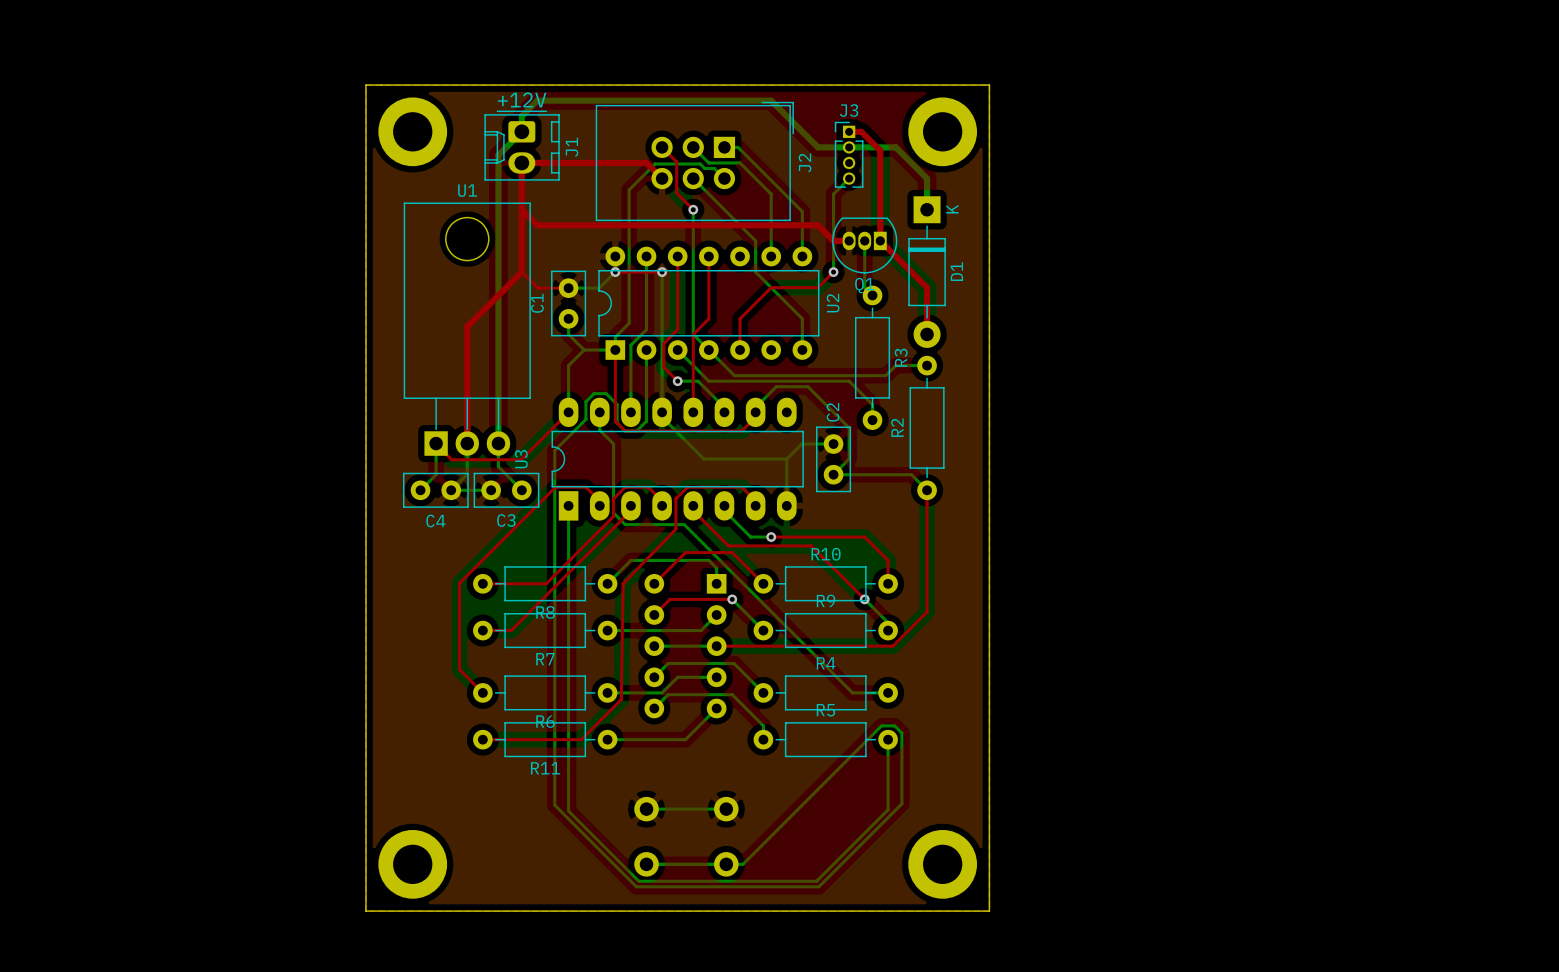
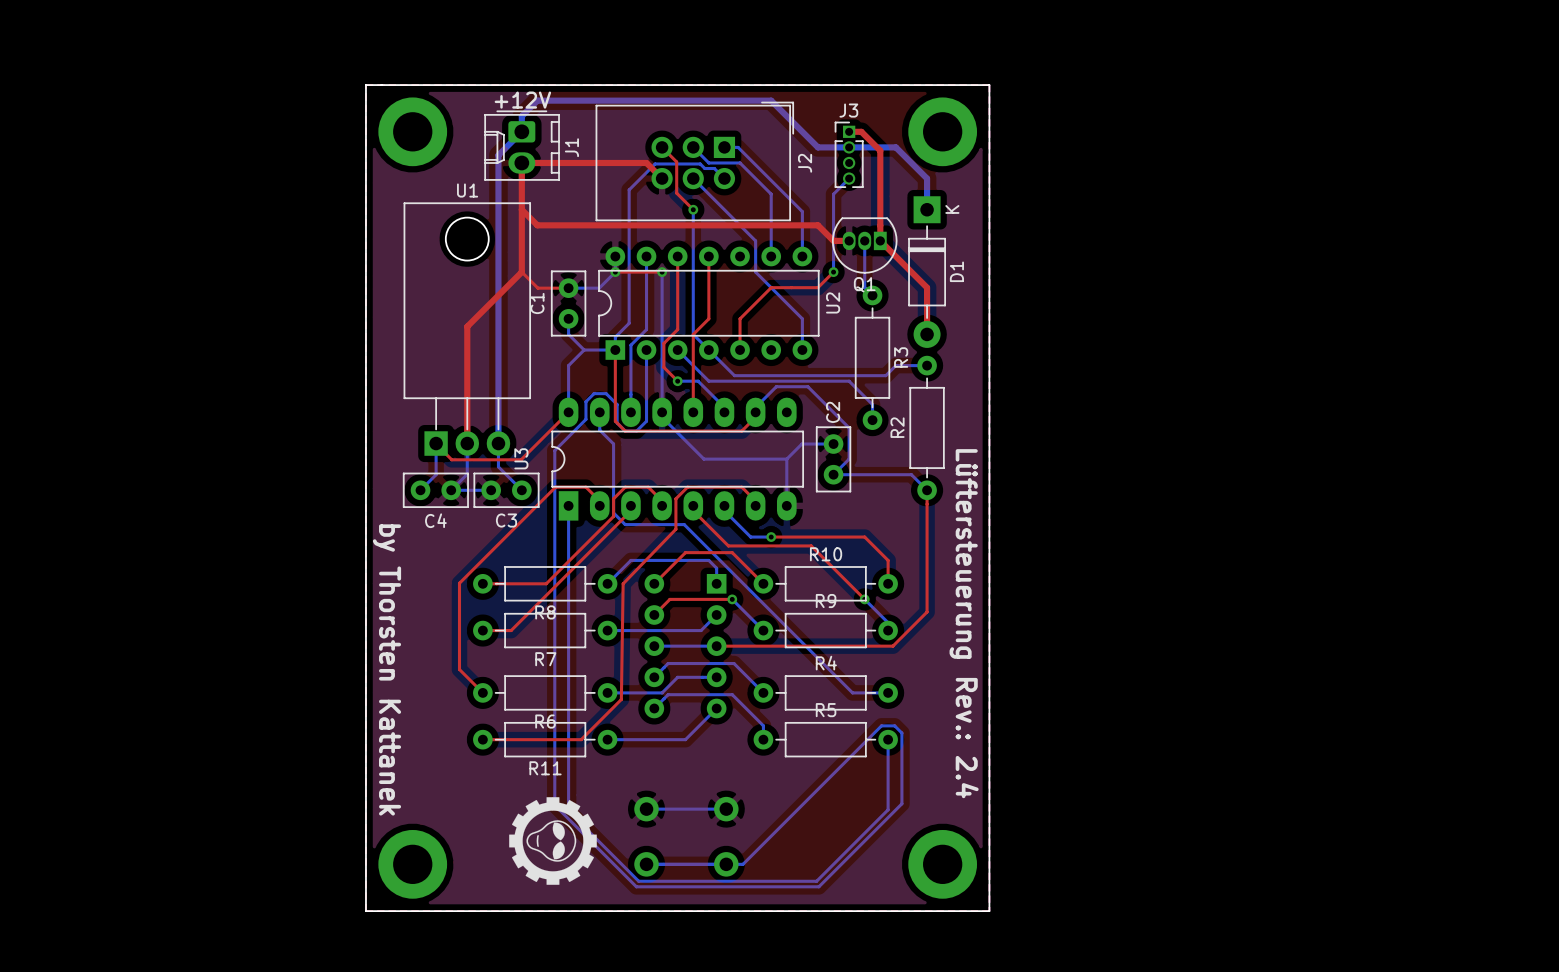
text: none -> Lüftersteuerung Rev.: 2.4 (964, 623)
text: none -> by Thorsten Kattanek (386, 669)
drawing: none -> [509, 797, 597, 885]

